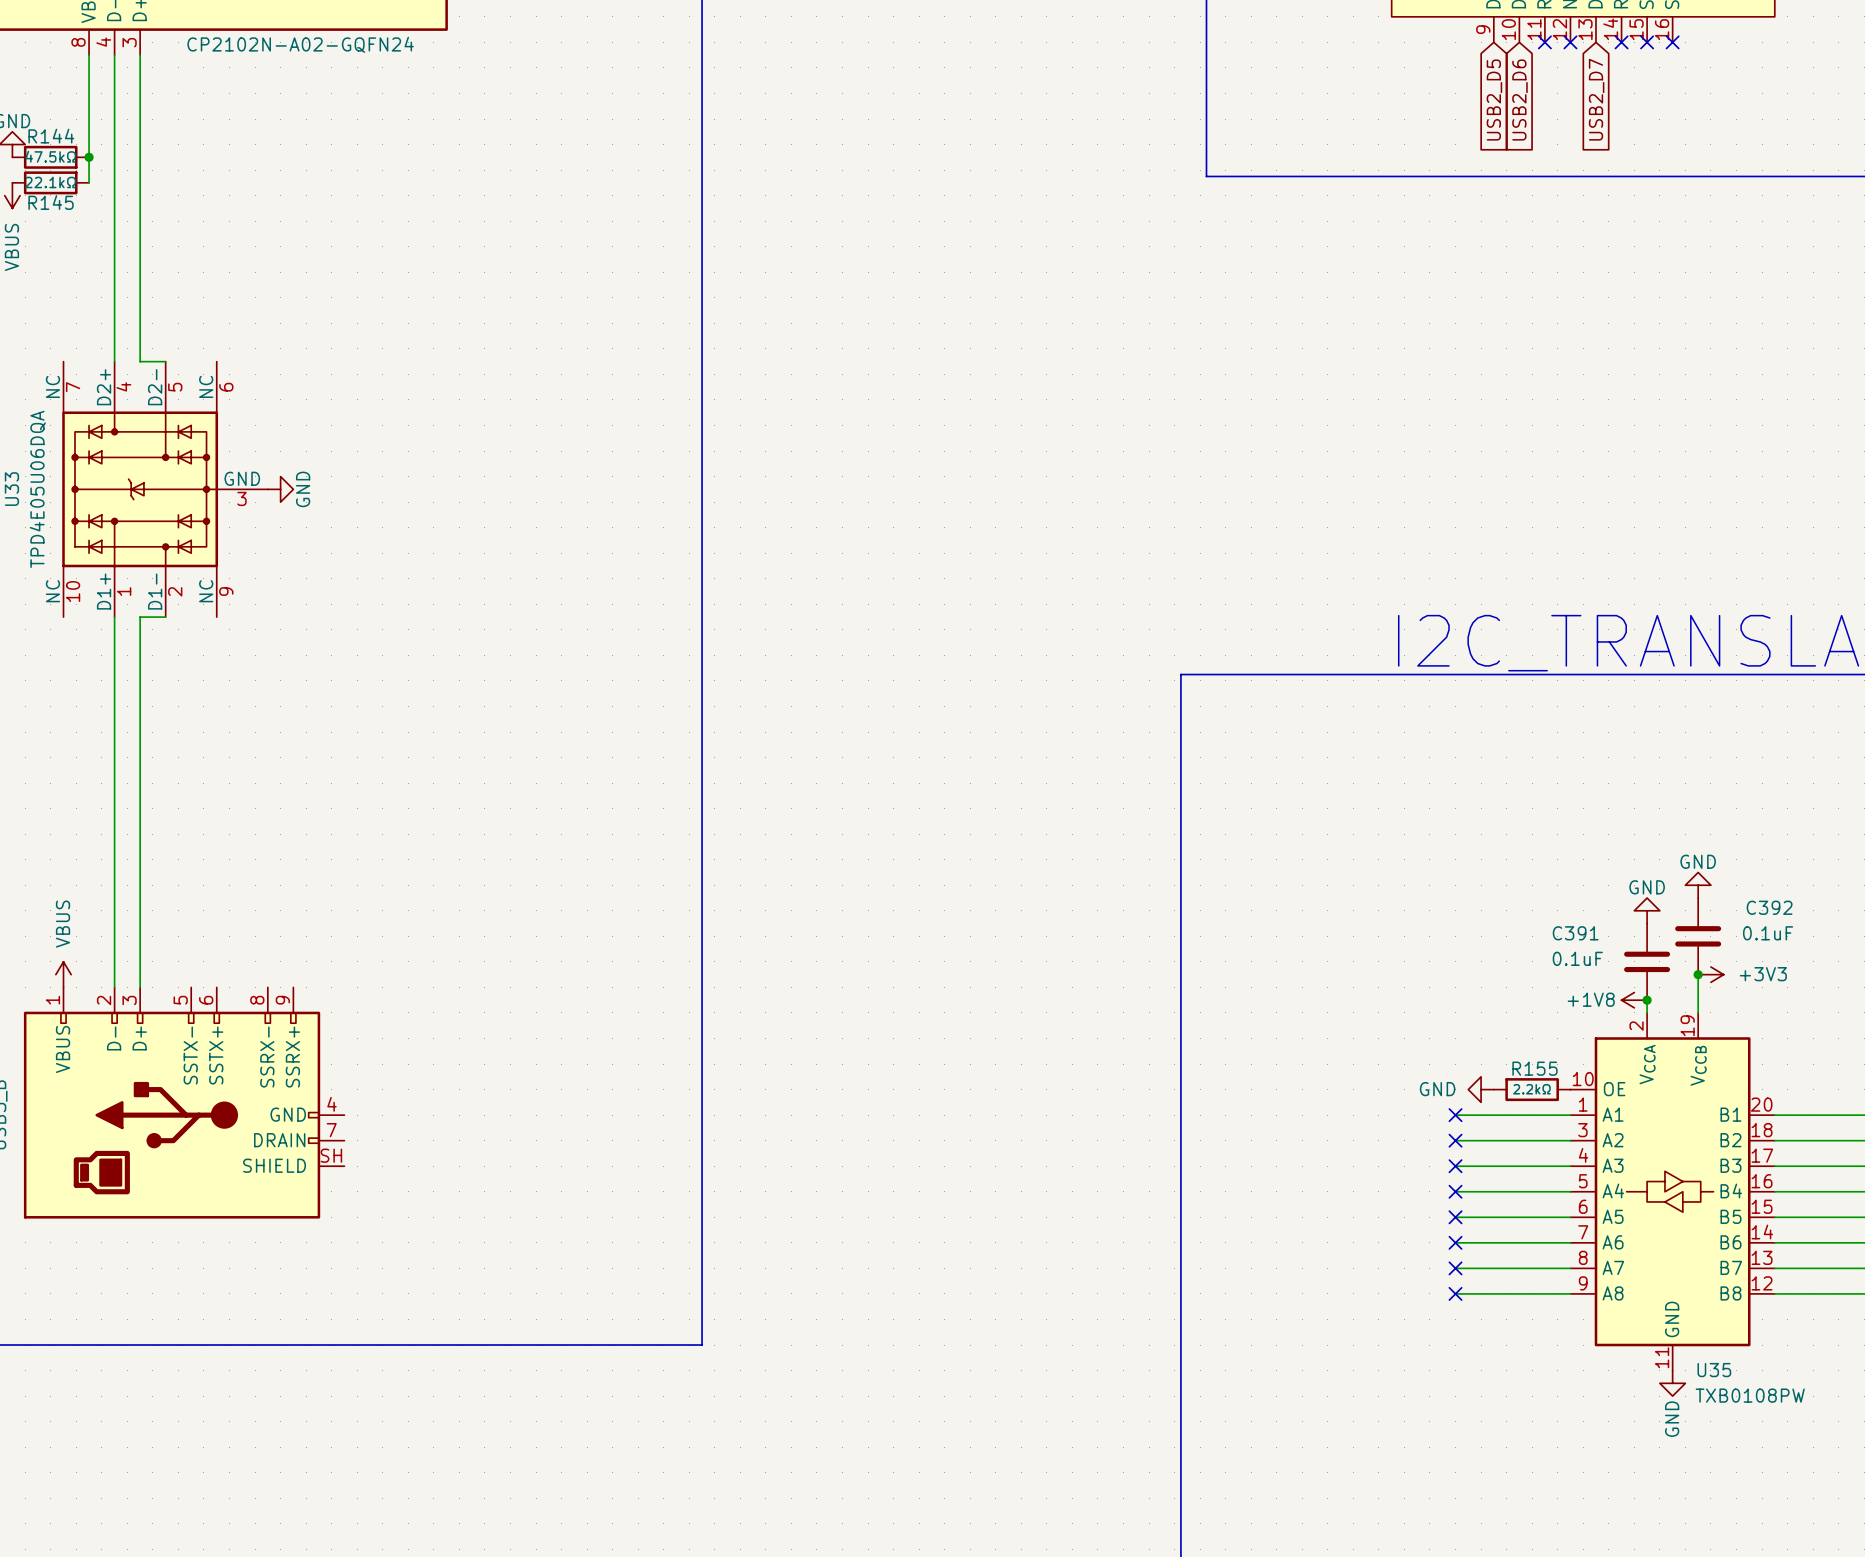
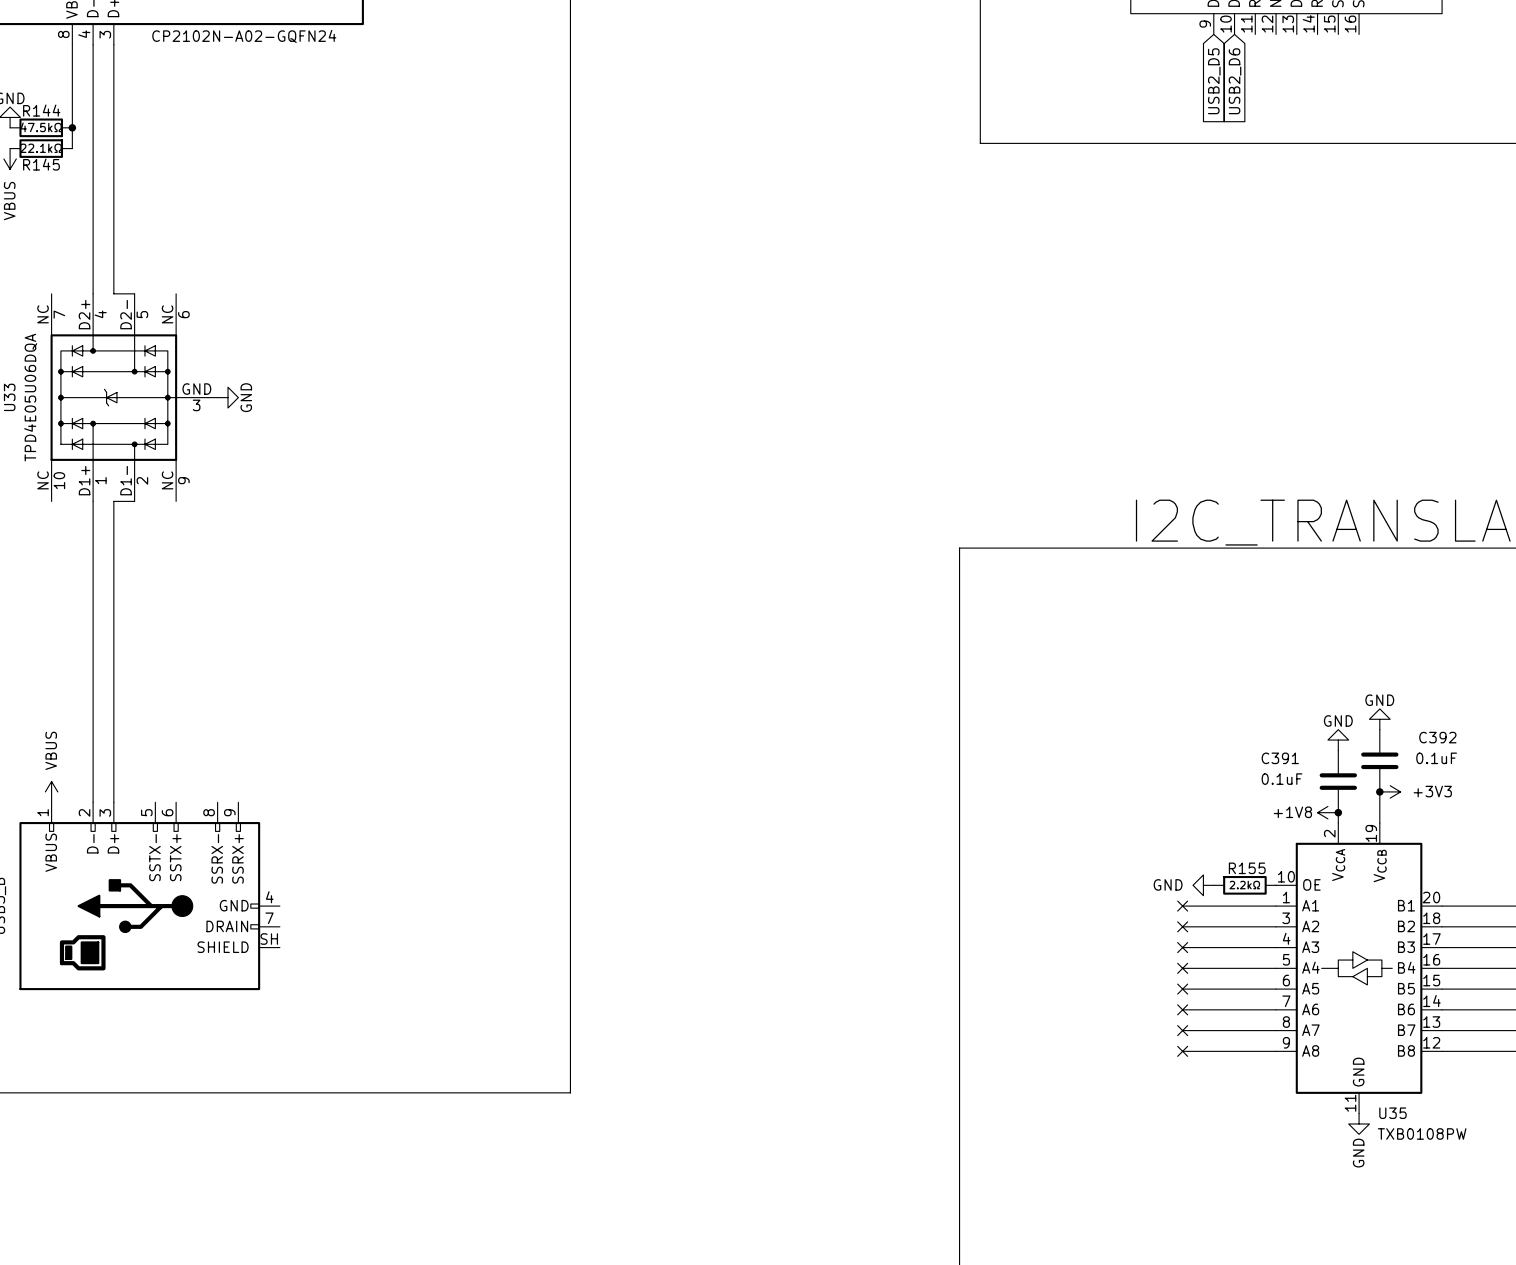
no-connect mark: (1544, 42) -> none
no-connect mark: (1570, 42) -> none
no-connect mark: (1621, 42) -> none
no-connect mark: (1647, 42) -> none
no-connect mark: (1672, 42) -> none
global label: USB2_D7 (1596, 99) -> none

